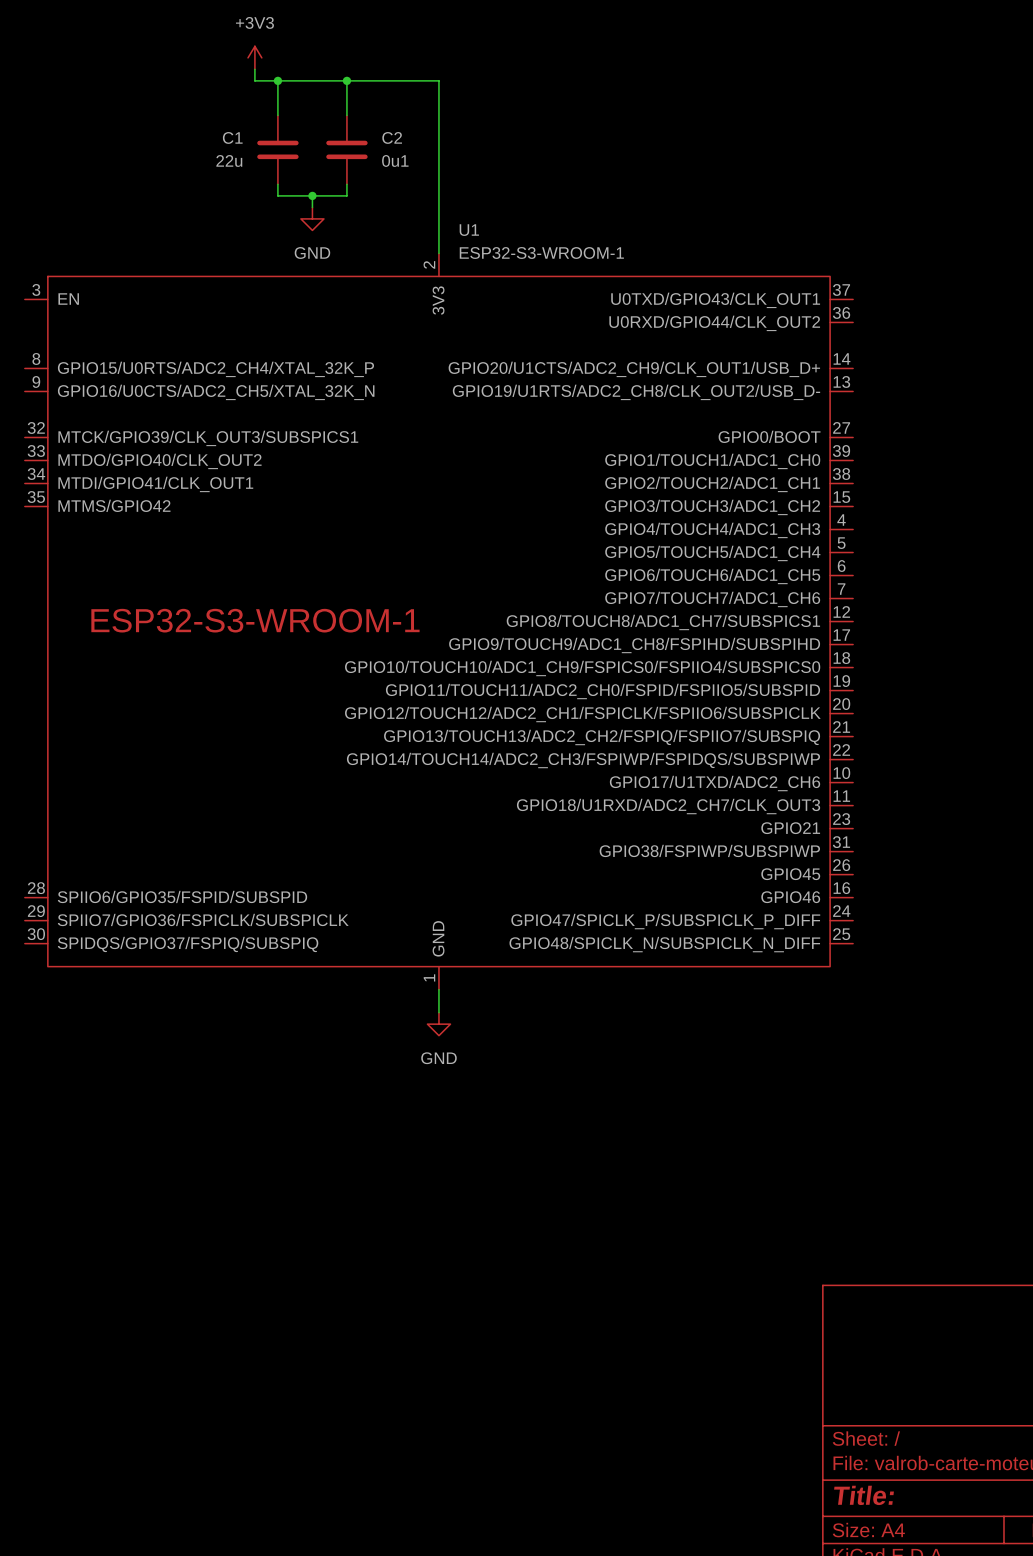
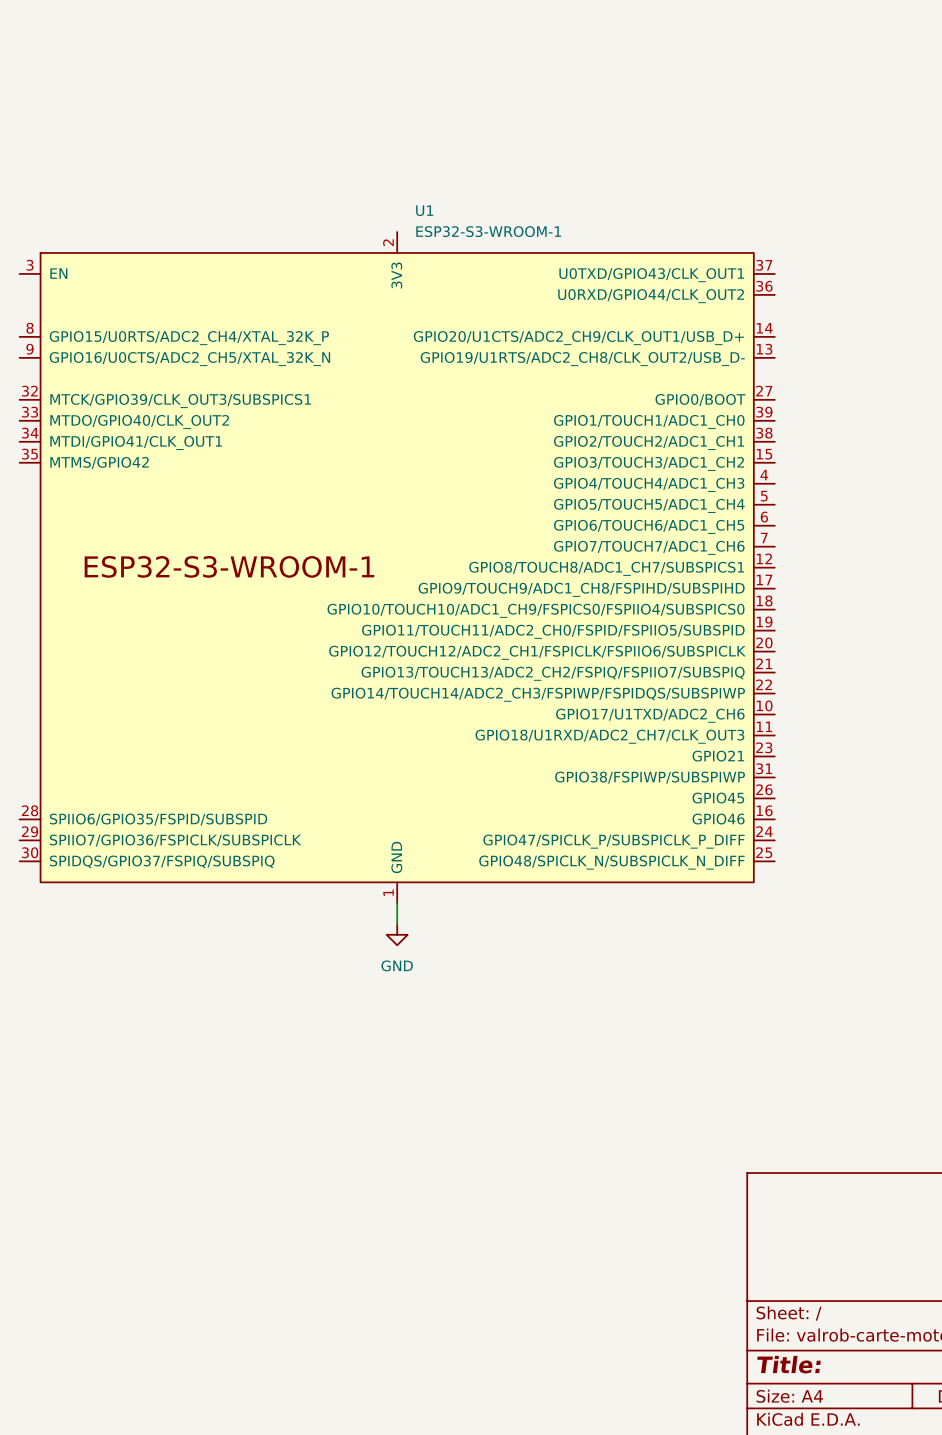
power symbol: +3V3 (254, 57) -> none
wire: (254, 69) (254, 80) (438, 80) (438, 253) -> none
wire: (277, 80) (277, 115) -> none
junction: (277, 80) -> none
wire: (346, 80) (346, 115) -> none
junction: (346, 80) -> none
C1: 22u (277, 149) -> none
C2: 0u1 (346, 149) -> none
wire: (277, 184) (277, 195) (346, 195) (346, 184) -> none
wire: (312, 195) (312, 207) -> none
junction: (312, 195) -> none
power symbol: GND (312, 218) -> none

